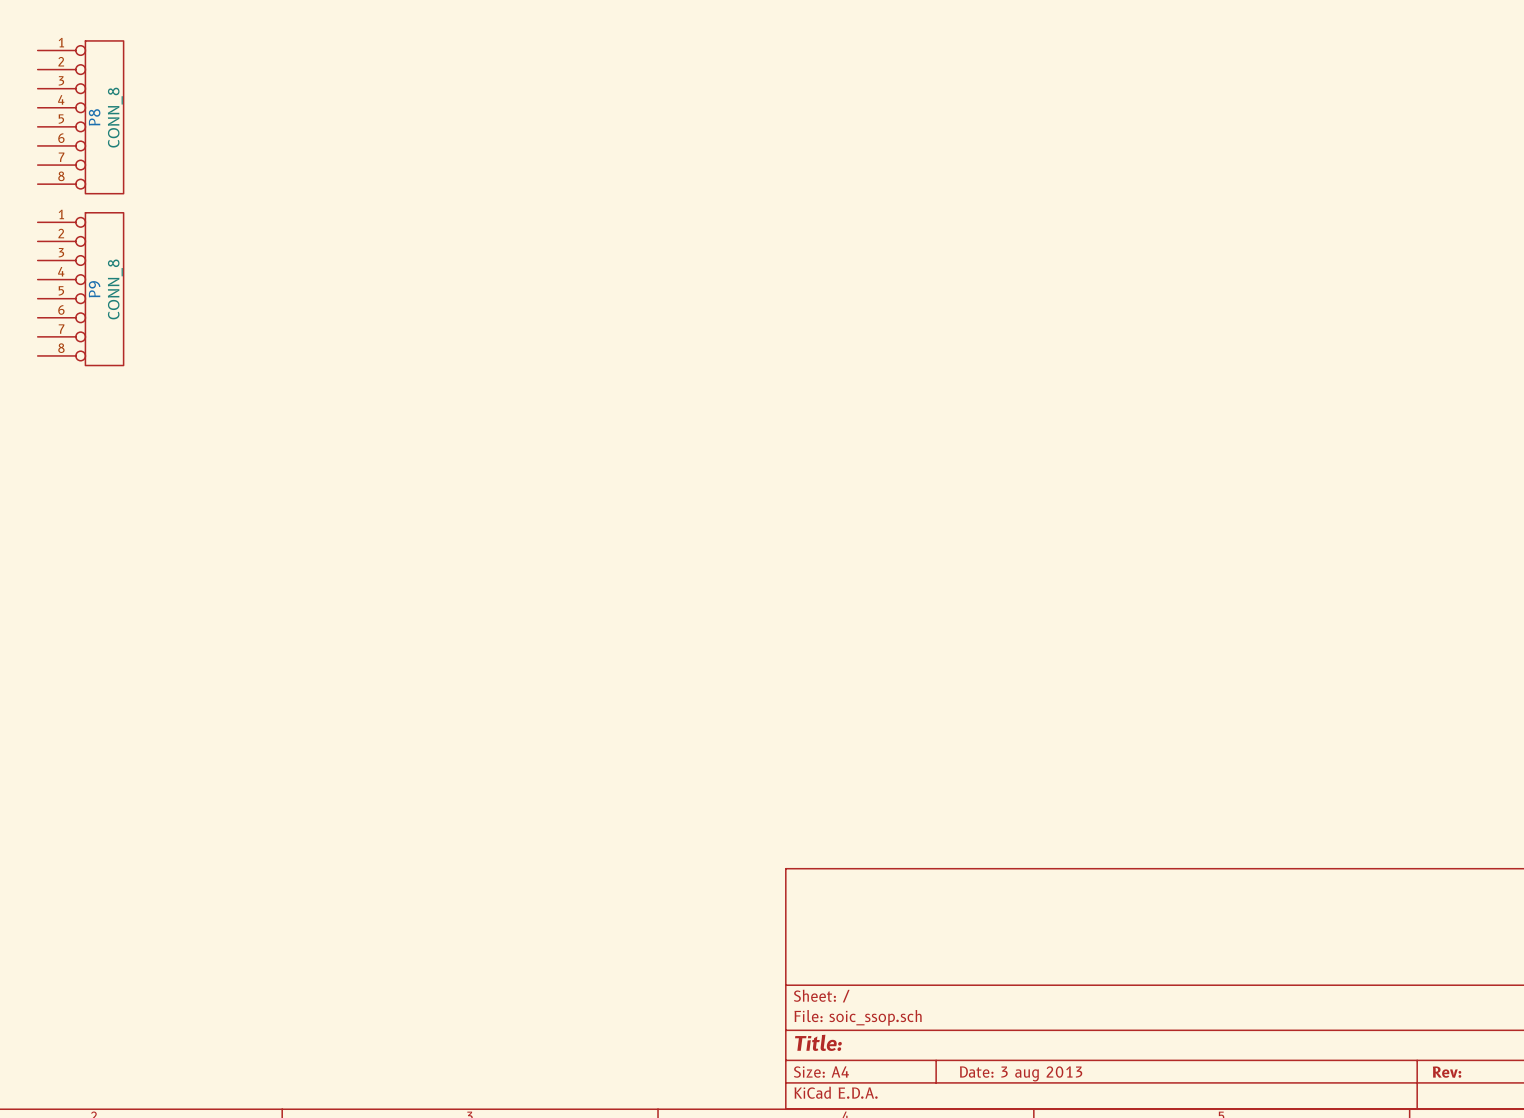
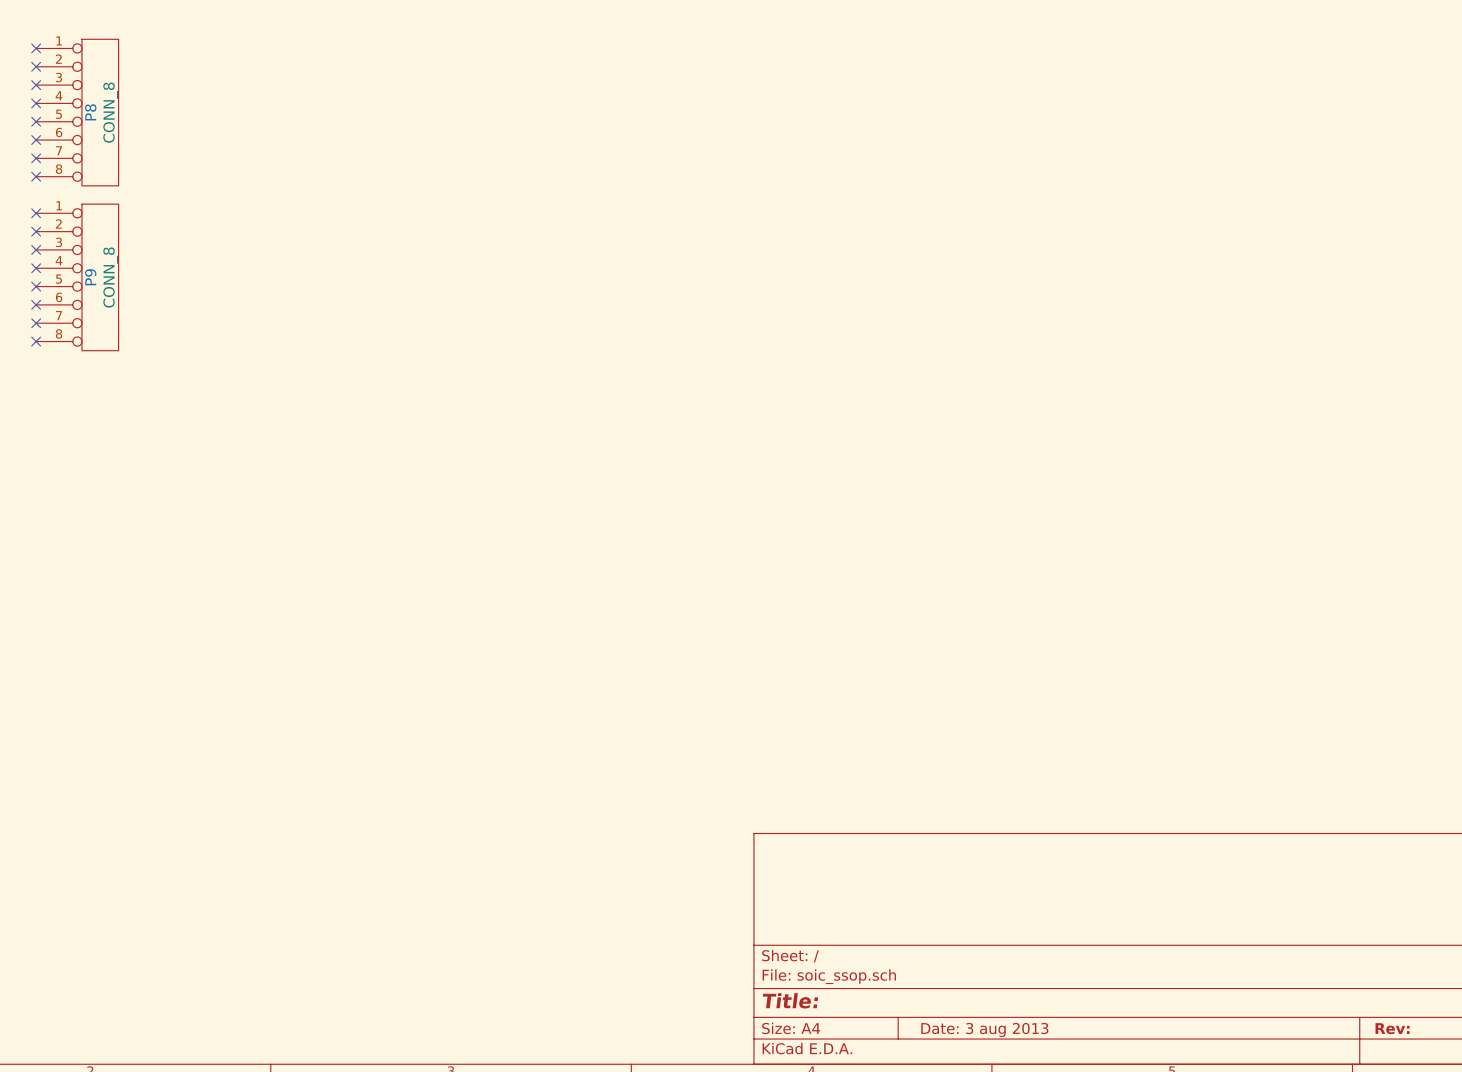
no-connect mark: none -> (36, 48)
no-connect mark: none -> (36, 66)
no-connect mark: none -> (36, 85)
no-connect mark: none -> (36, 103)
no-connect mark: none -> (36, 121)
no-connect mark: none -> (36, 140)
no-connect mark: none -> (36, 158)
no-connect mark: none -> (36, 176)
no-connect mark: none -> (36, 213)
no-connect mark: none -> (36, 231)
no-connect mark: none -> (36, 249)
no-connect mark: none -> (36, 268)
no-connect mark: none -> (36, 286)
no-connect mark: none -> (36, 304)
no-connect mark: none -> (36, 323)
no-connect mark: none -> (36, 341)

